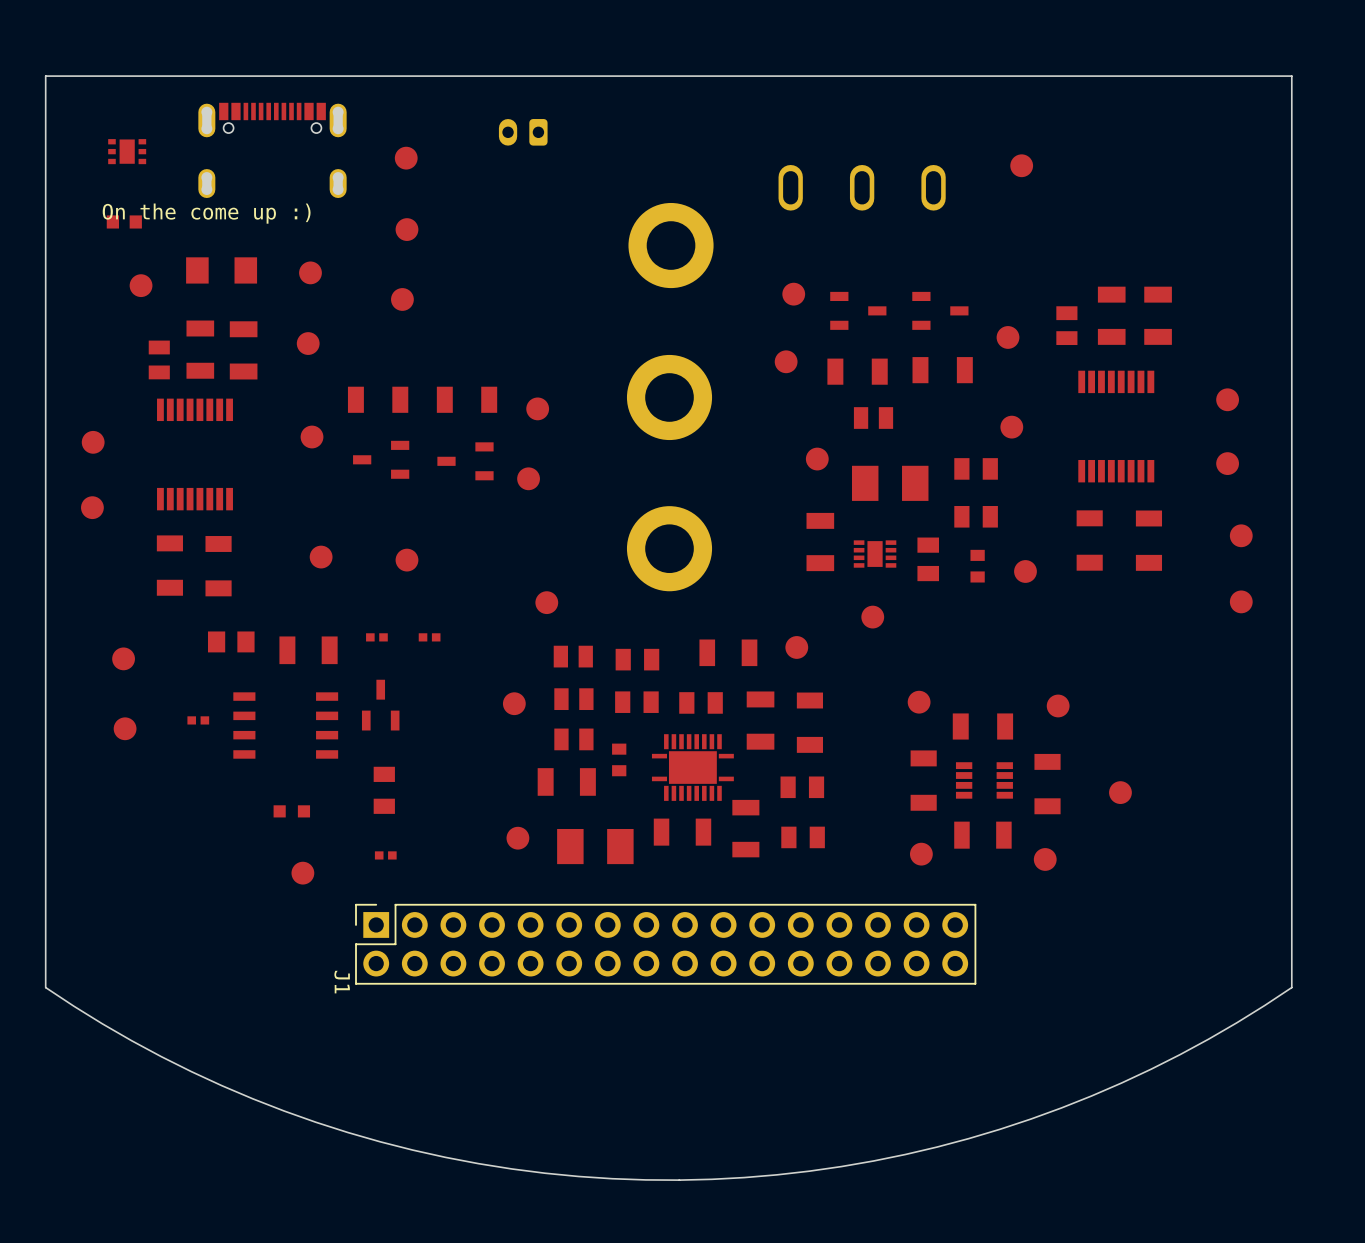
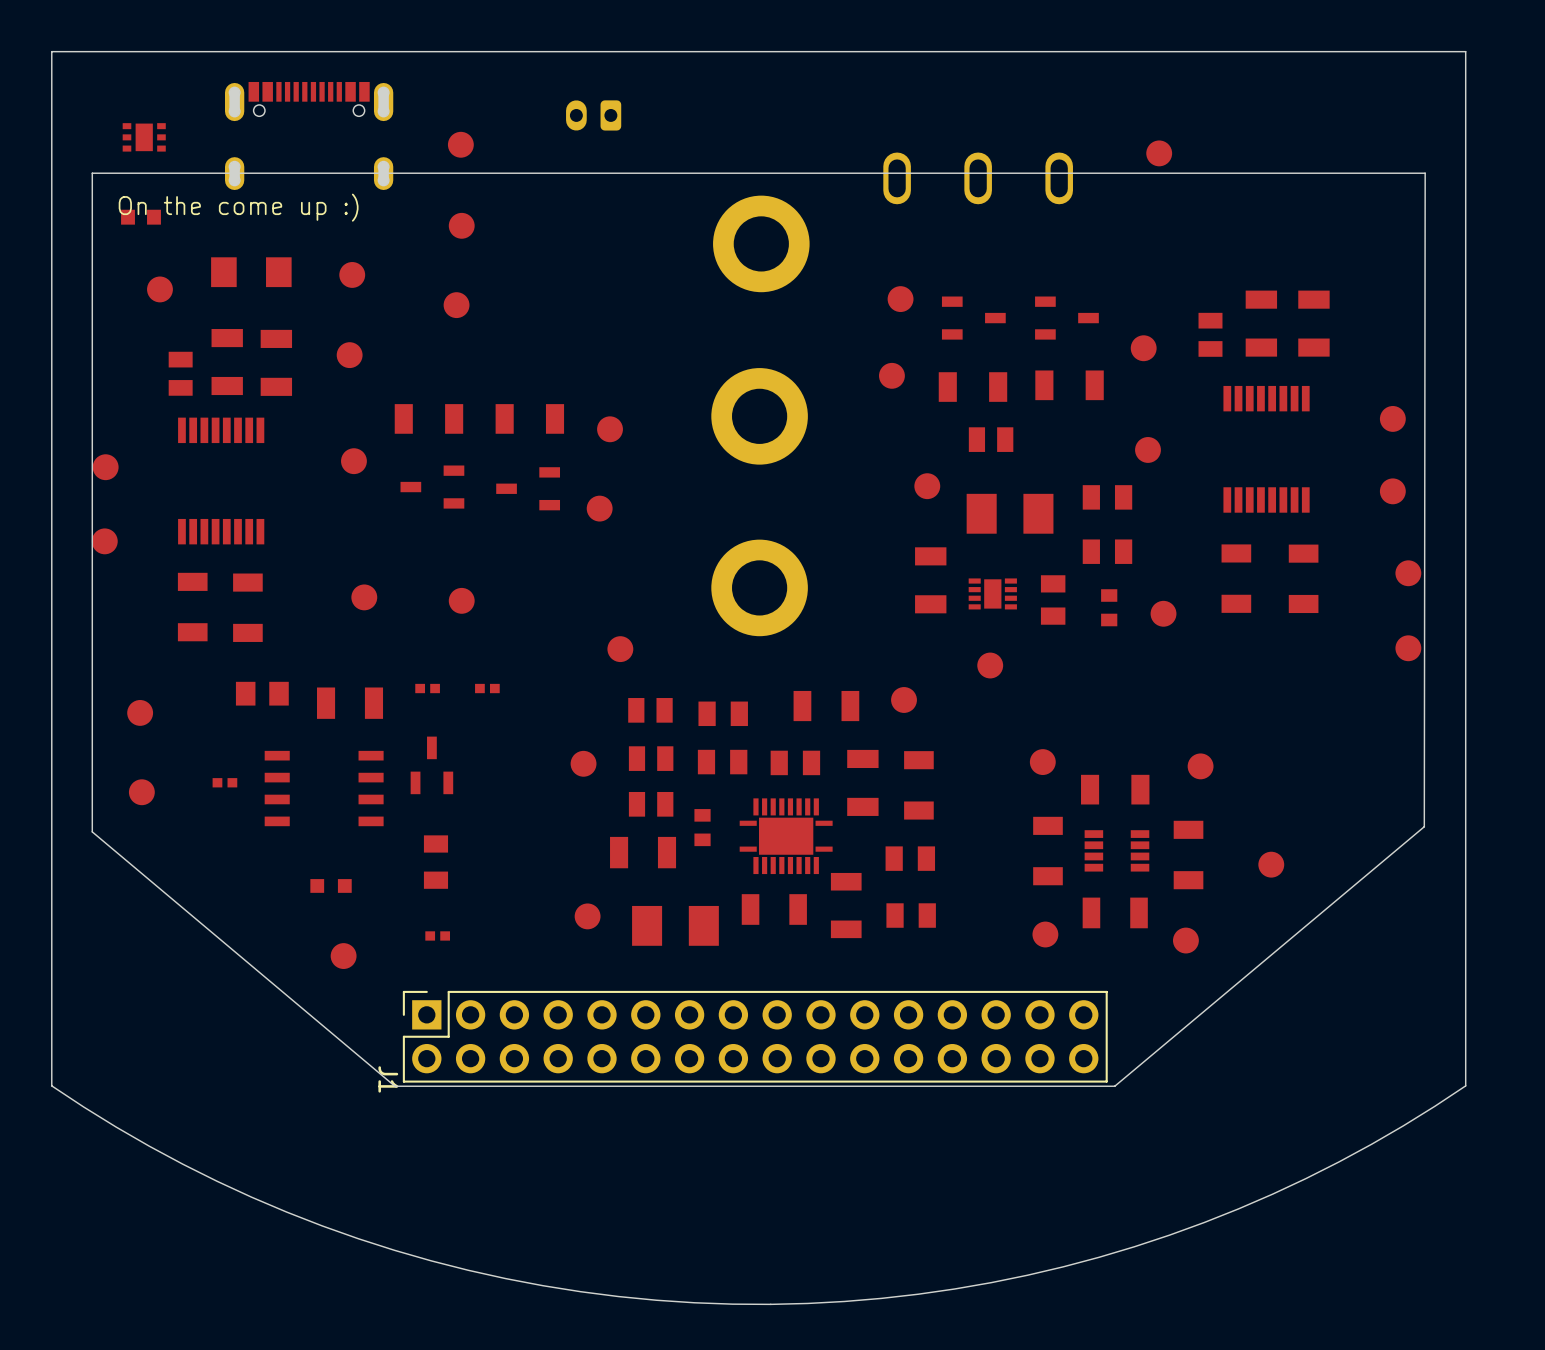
board edge: none -> (1425, 173) (1424, 826) (1114, 1086) (394, 1086) (92, 831) (92, 173) (1425, 173)

